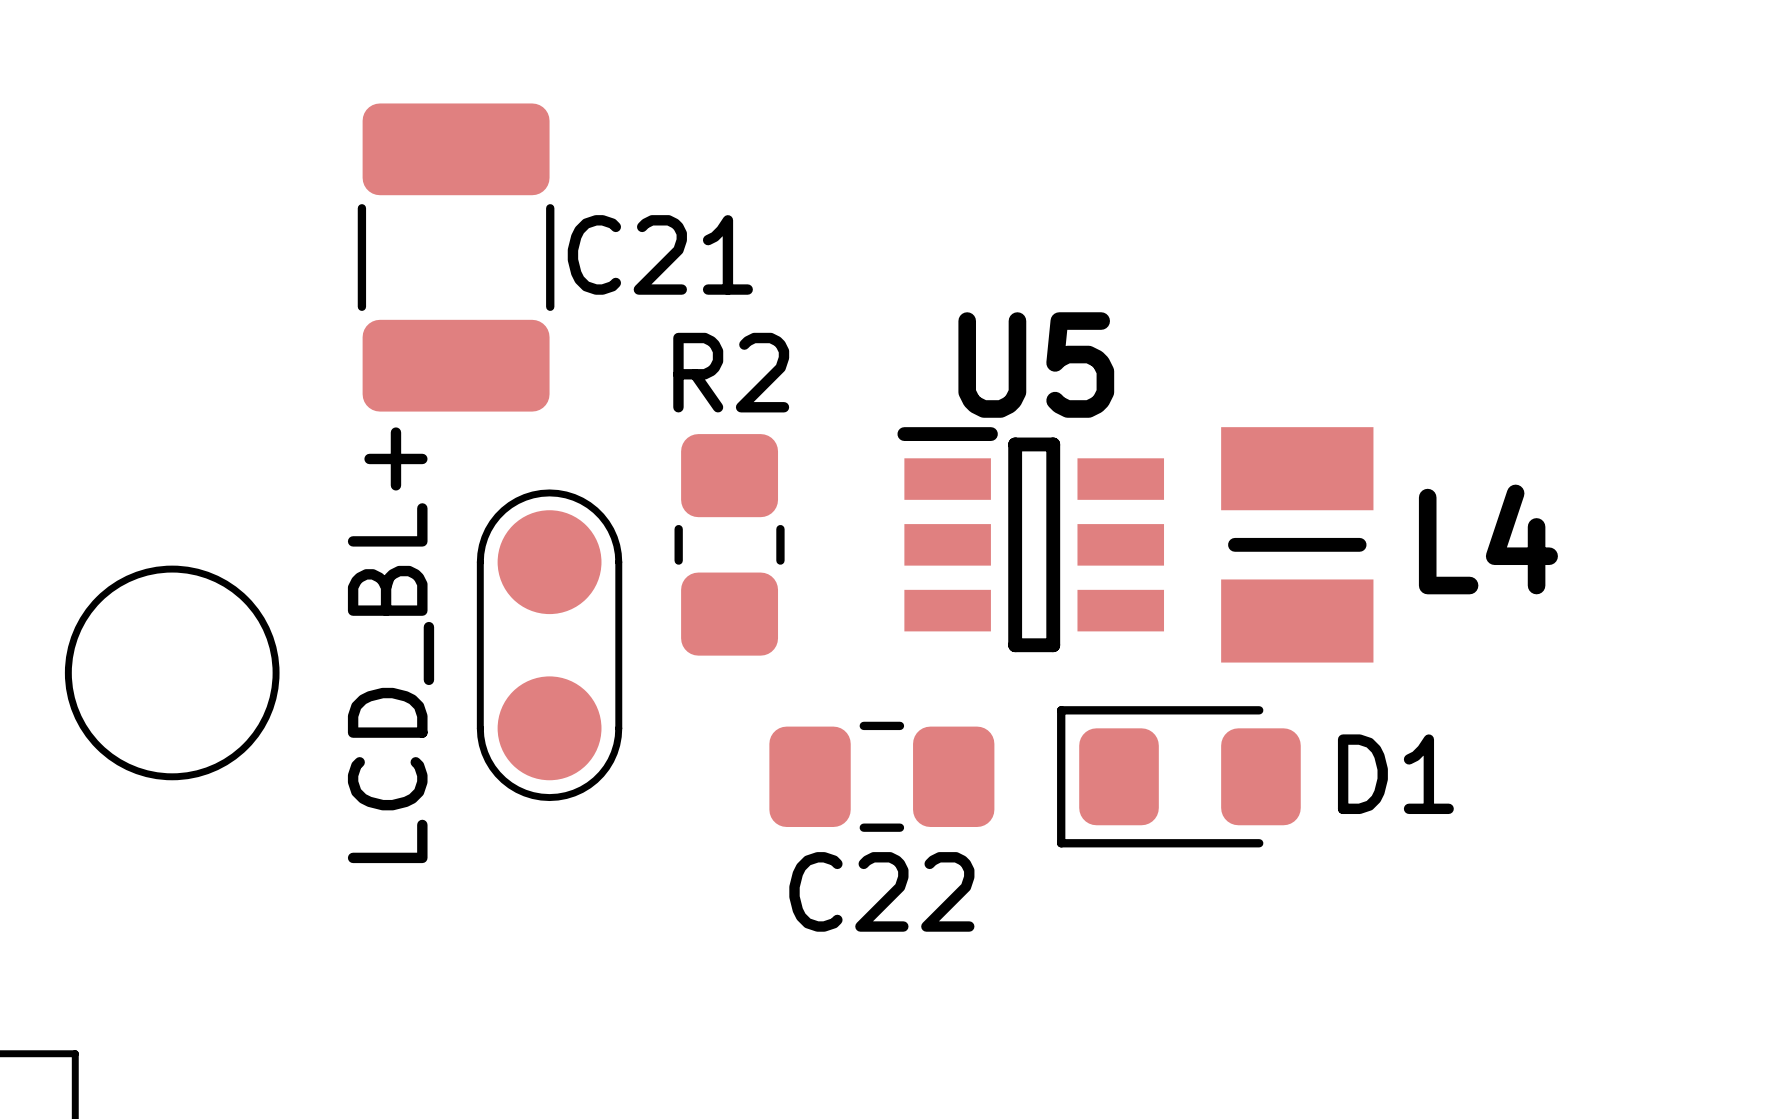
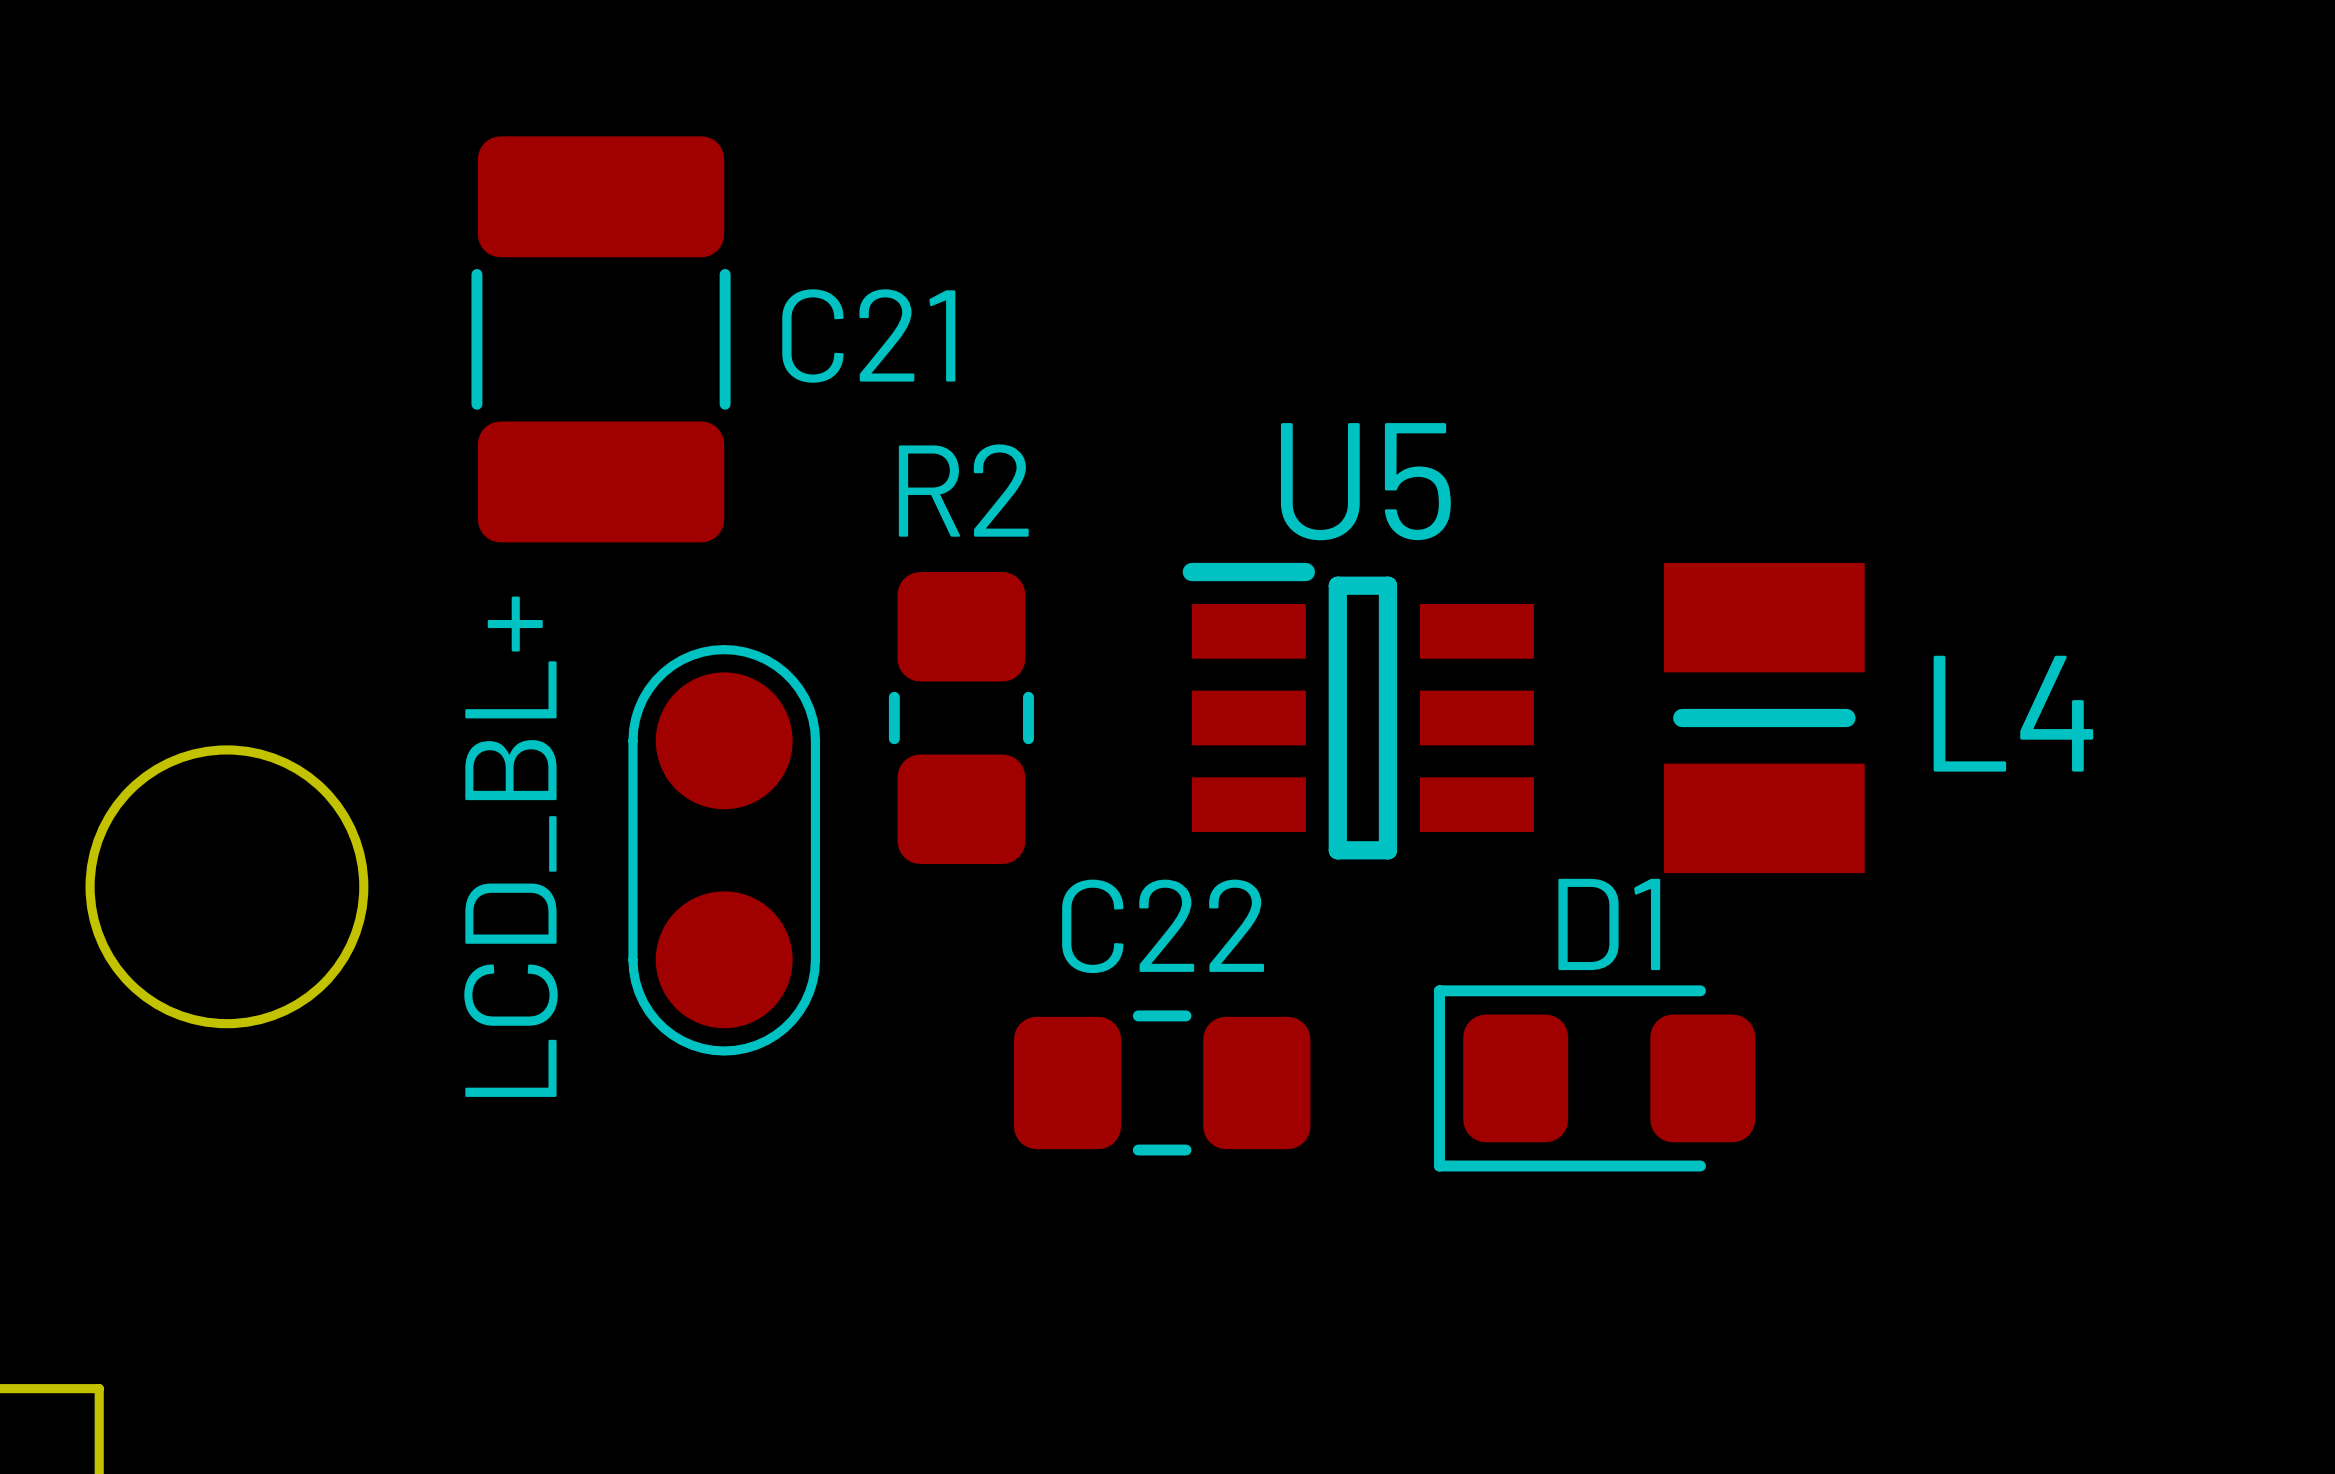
L4 position: (1297, 544) -> (1764, 718)
D1 name position: D1 (1395, 774) -> D1 (1609, 924)
C22 position: (881, 776) -> (1162, 1082)
D1 position: (1178, 776) -> (1594, 1078)
C22 name position: C22 (881, 891) -> C22 (1163, 926)

